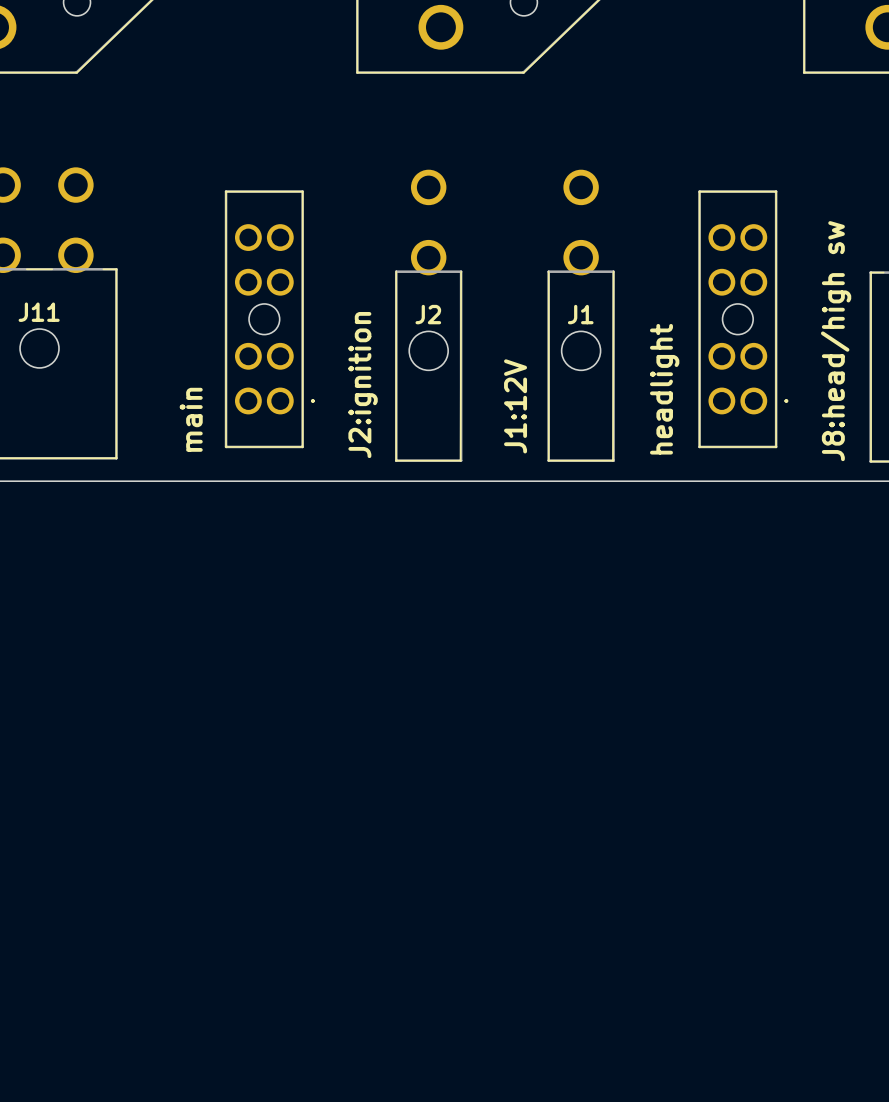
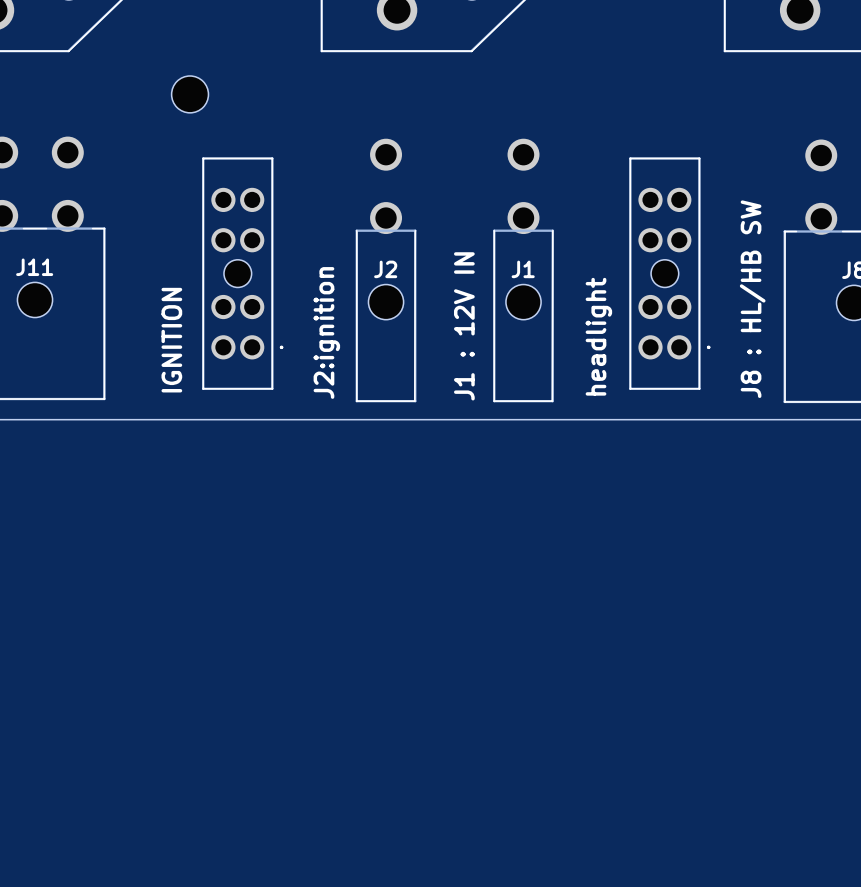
part: none -> (190, 94)
text: J8:head/high sw (836, 341) -> J8 : HL/HB SW (752, 299)
text: none -> IGNITION (171, 340)
text: J1:12V (515, 406) -> J1 : 12V IN (464, 326)
text: main (191, 419) -> none

